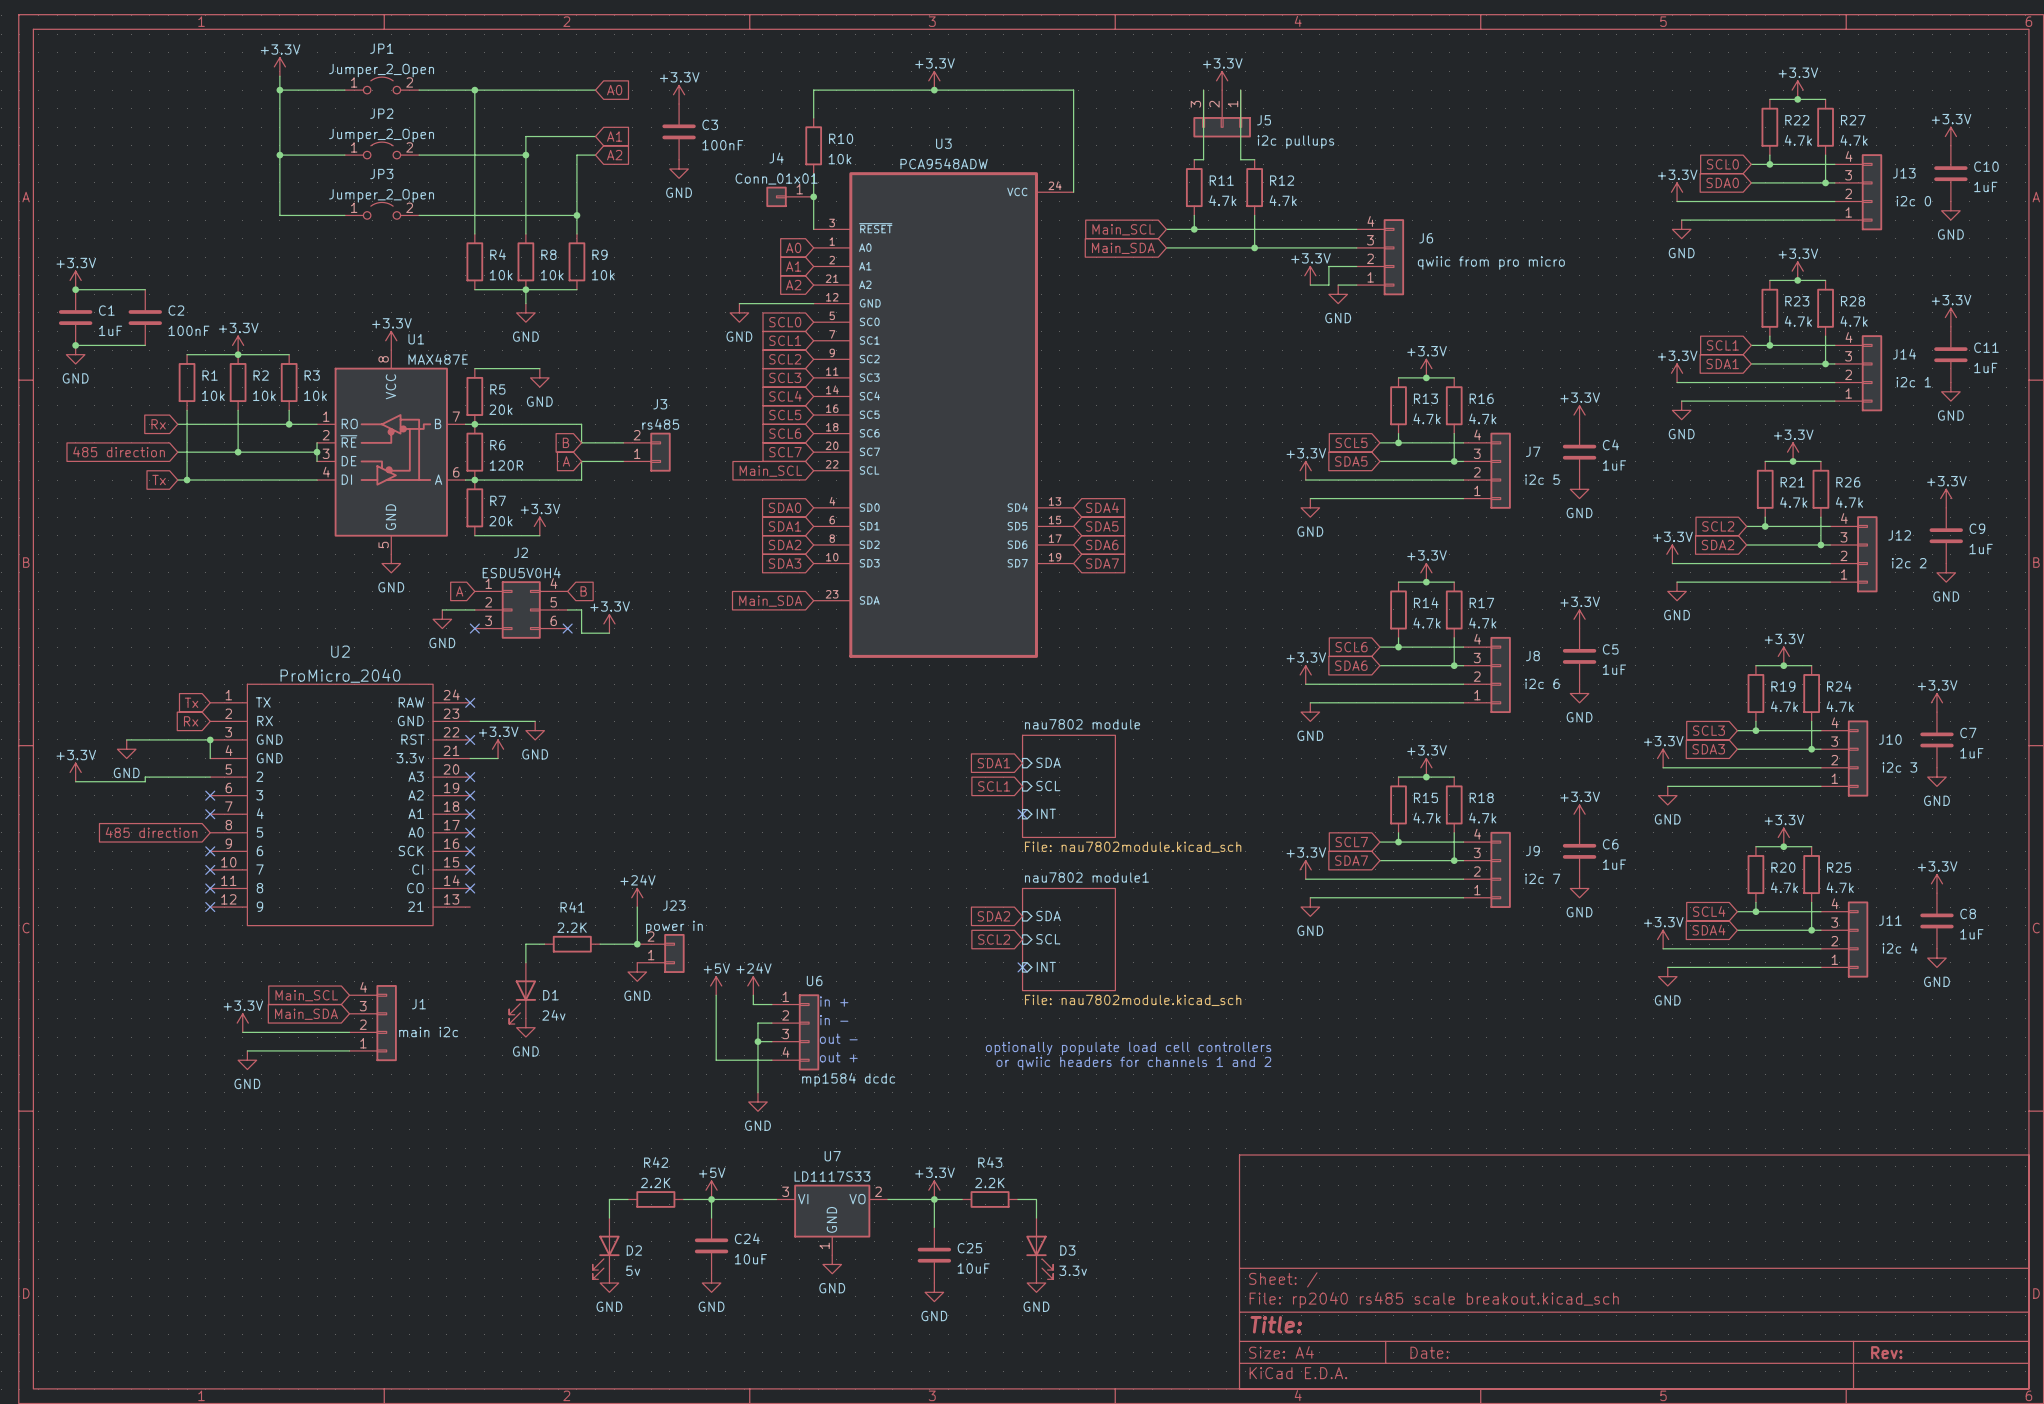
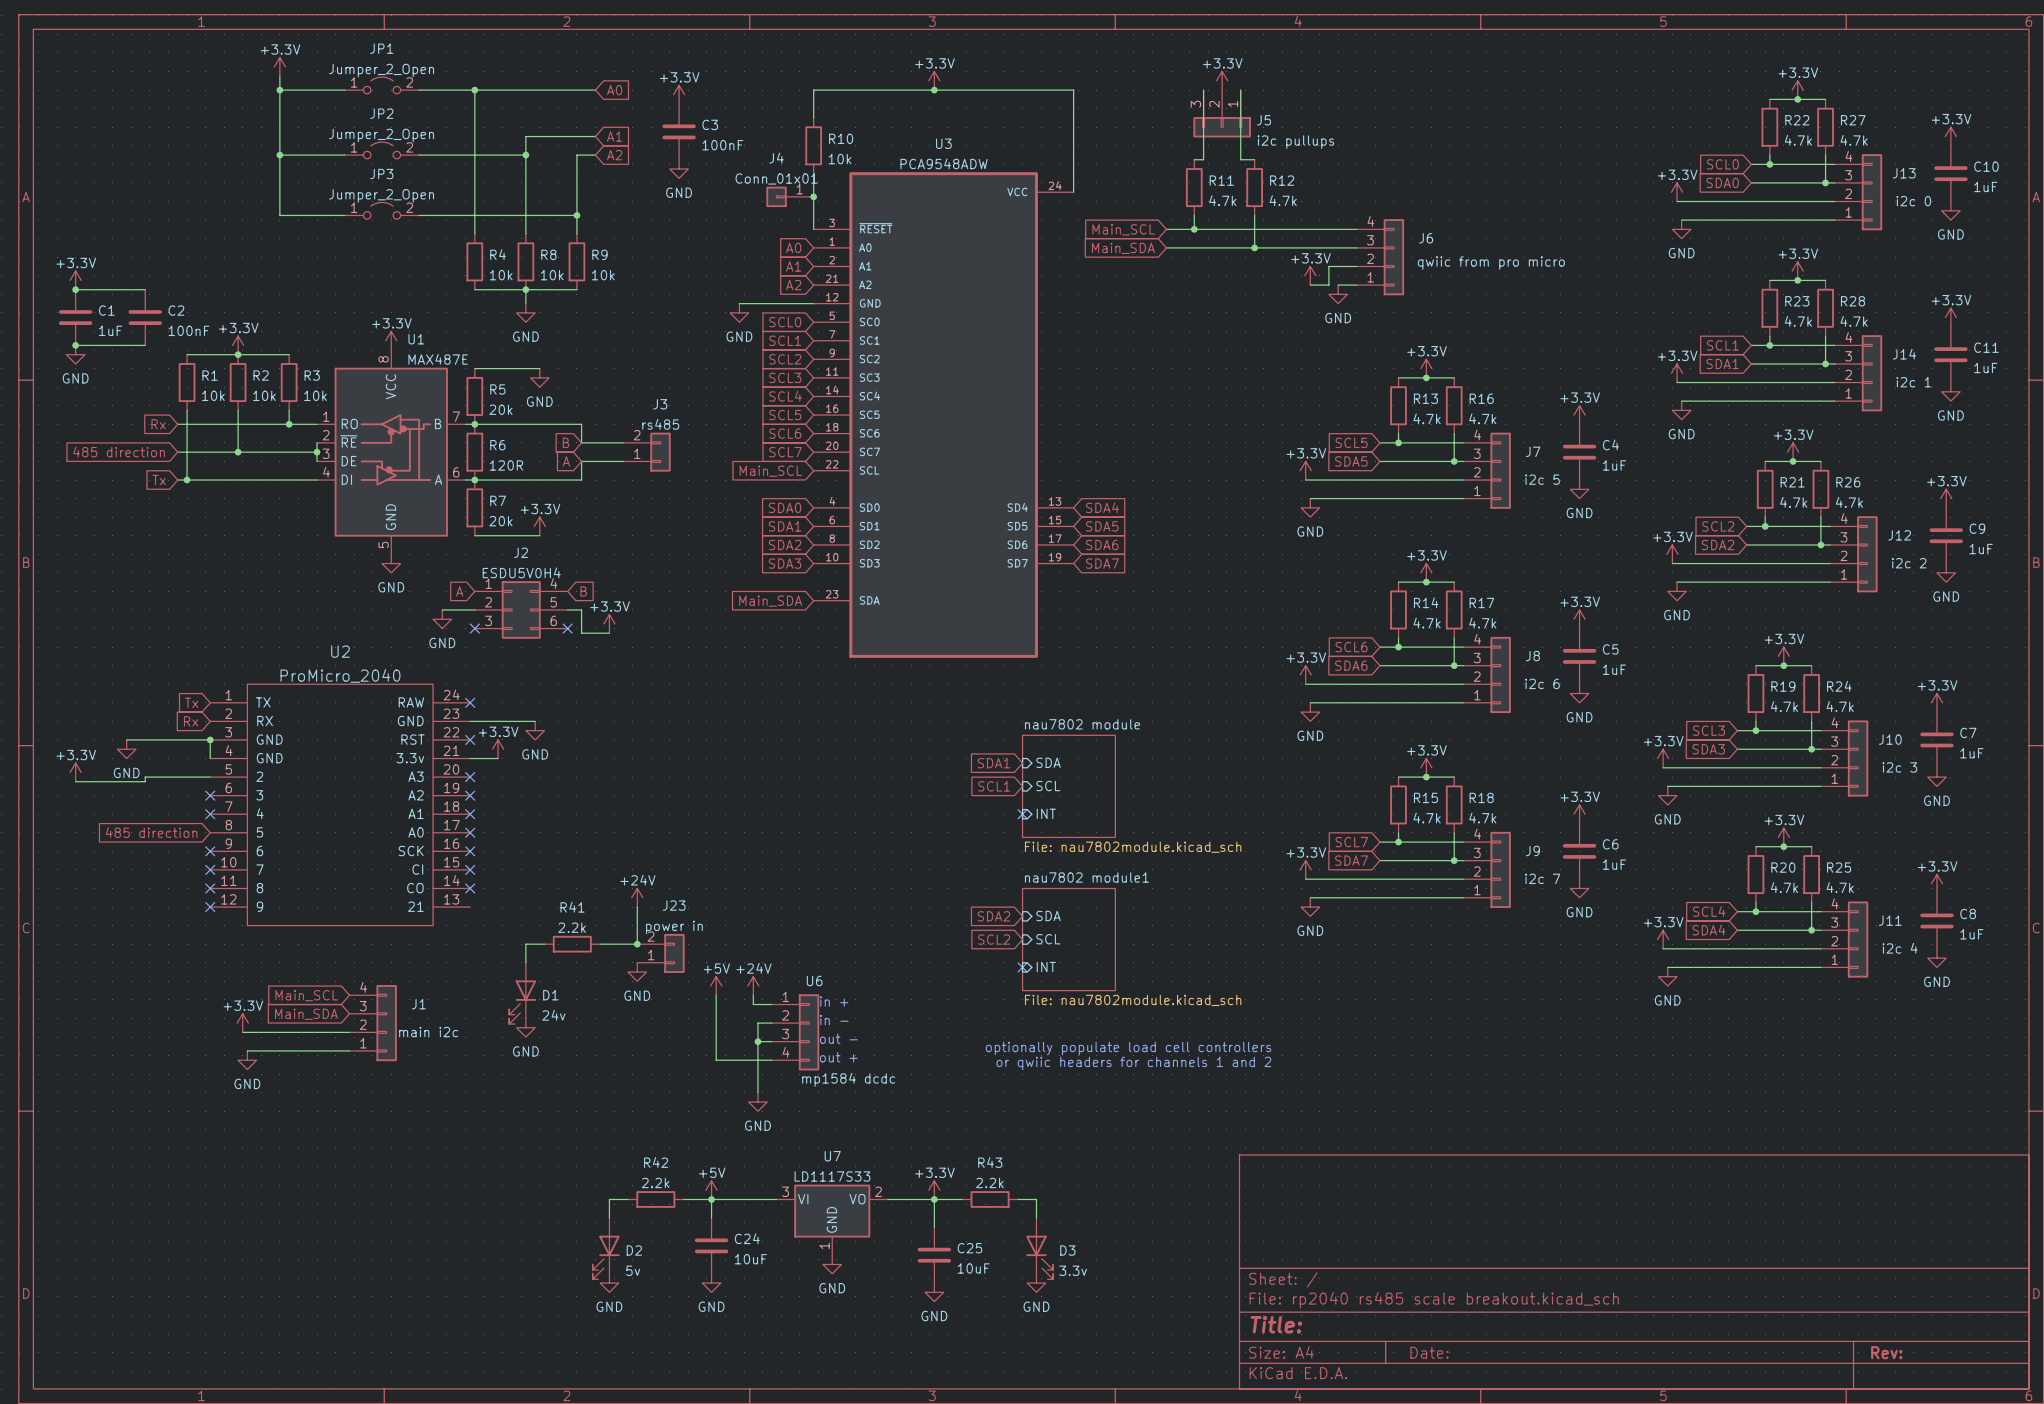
R41 value: 2.2K (572, 927) -> 2.2k (572, 927)
R42 value: 2.2K (655, 1182) -> 2.2k (655, 1182)
R43 value: 2.2K (989, 1182) -> 2.2k (989, 1182)

